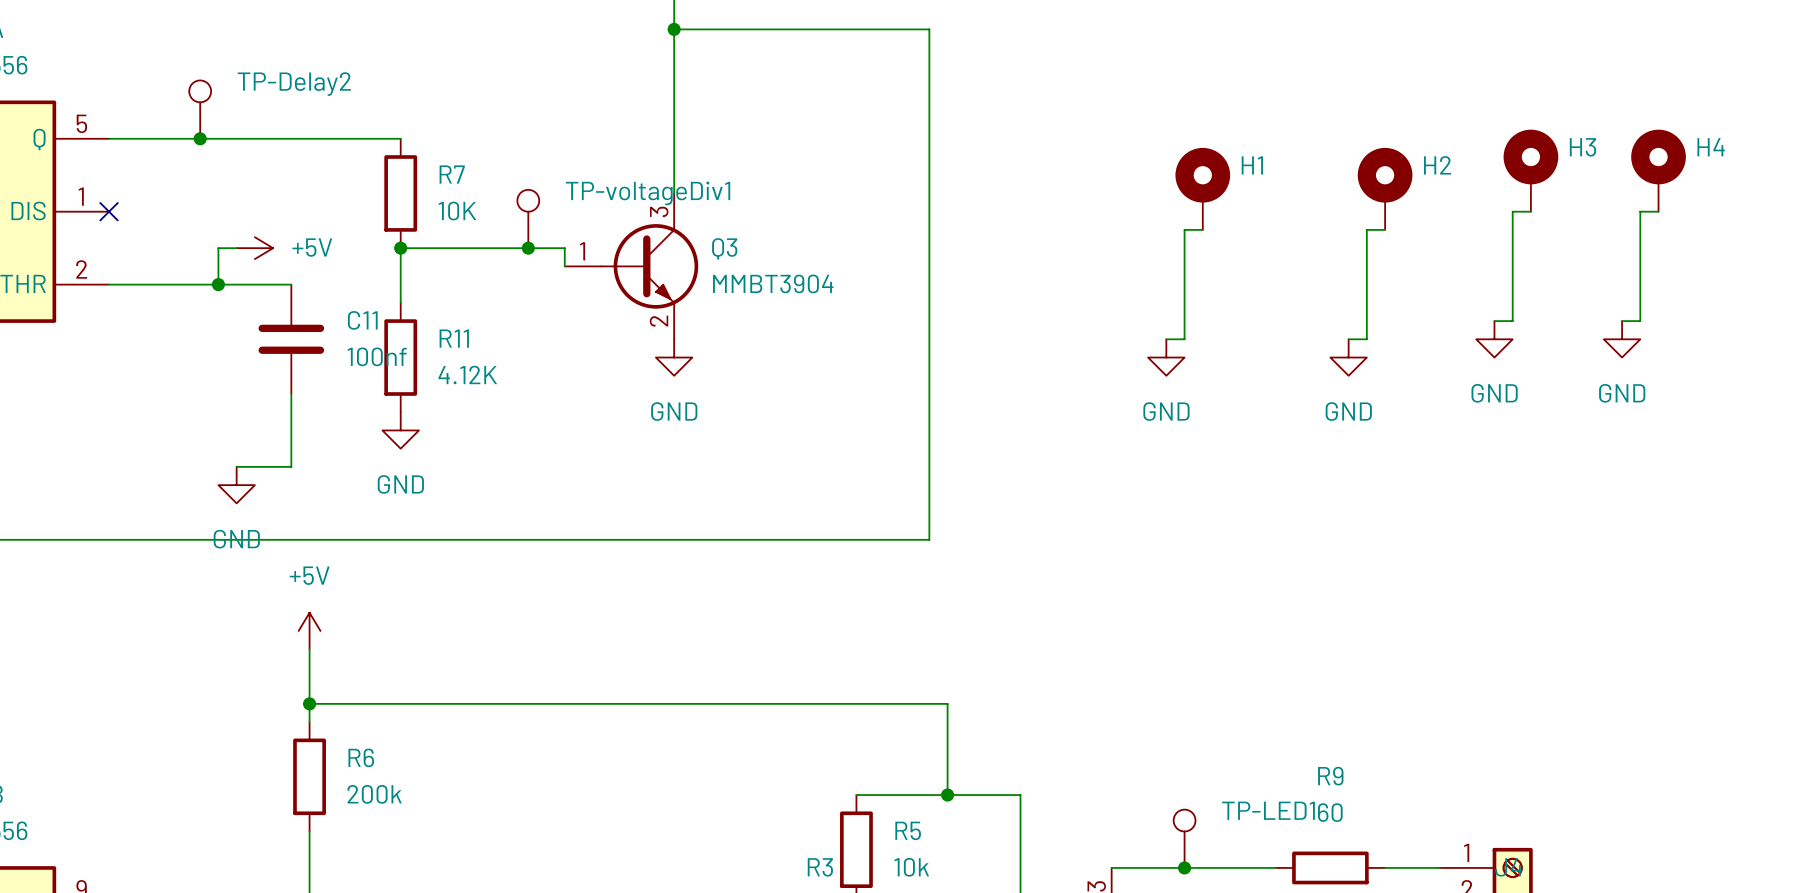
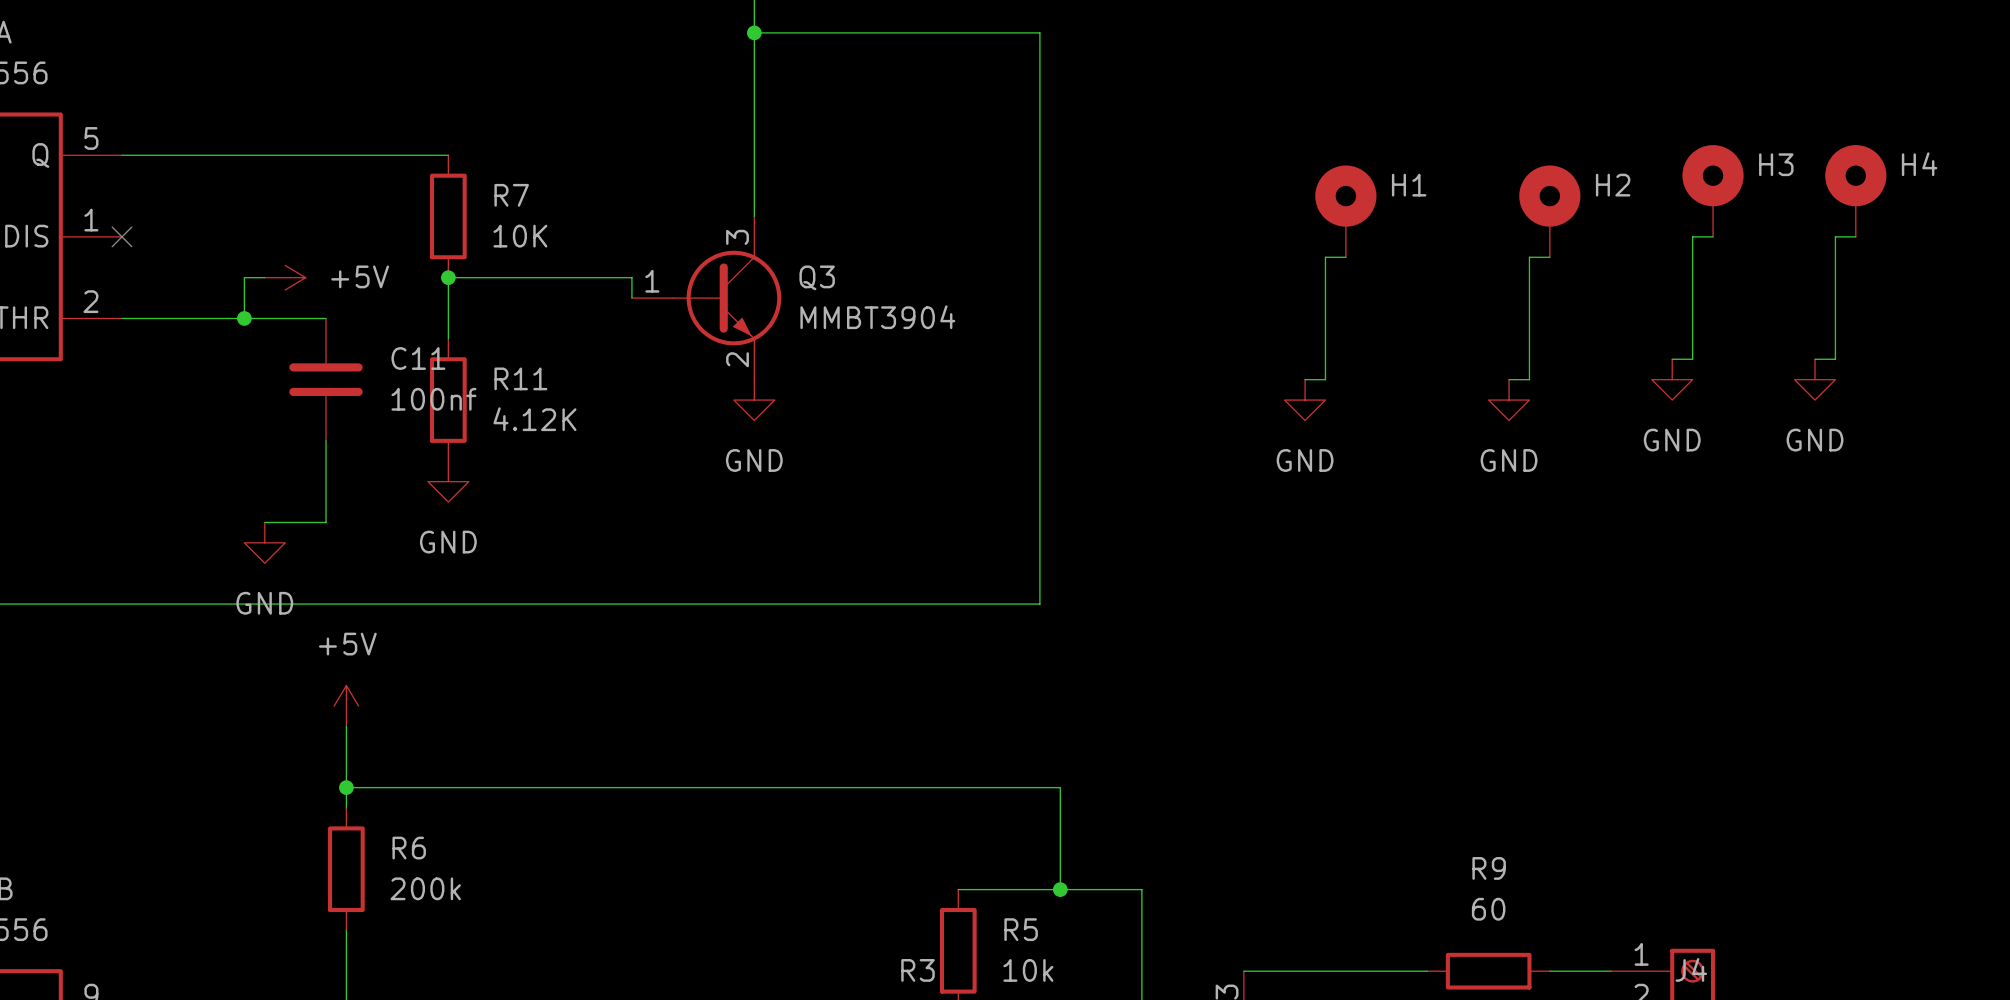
TP-Delay2: (200, 109) -> none
junction: (200, 138) -> none
TP-voltageDiv1: (528, 218) -> none
junction: (528, 248) -> none
TP-LED1: (1184, 838) -> none
junction: (1184, 867) -> none

